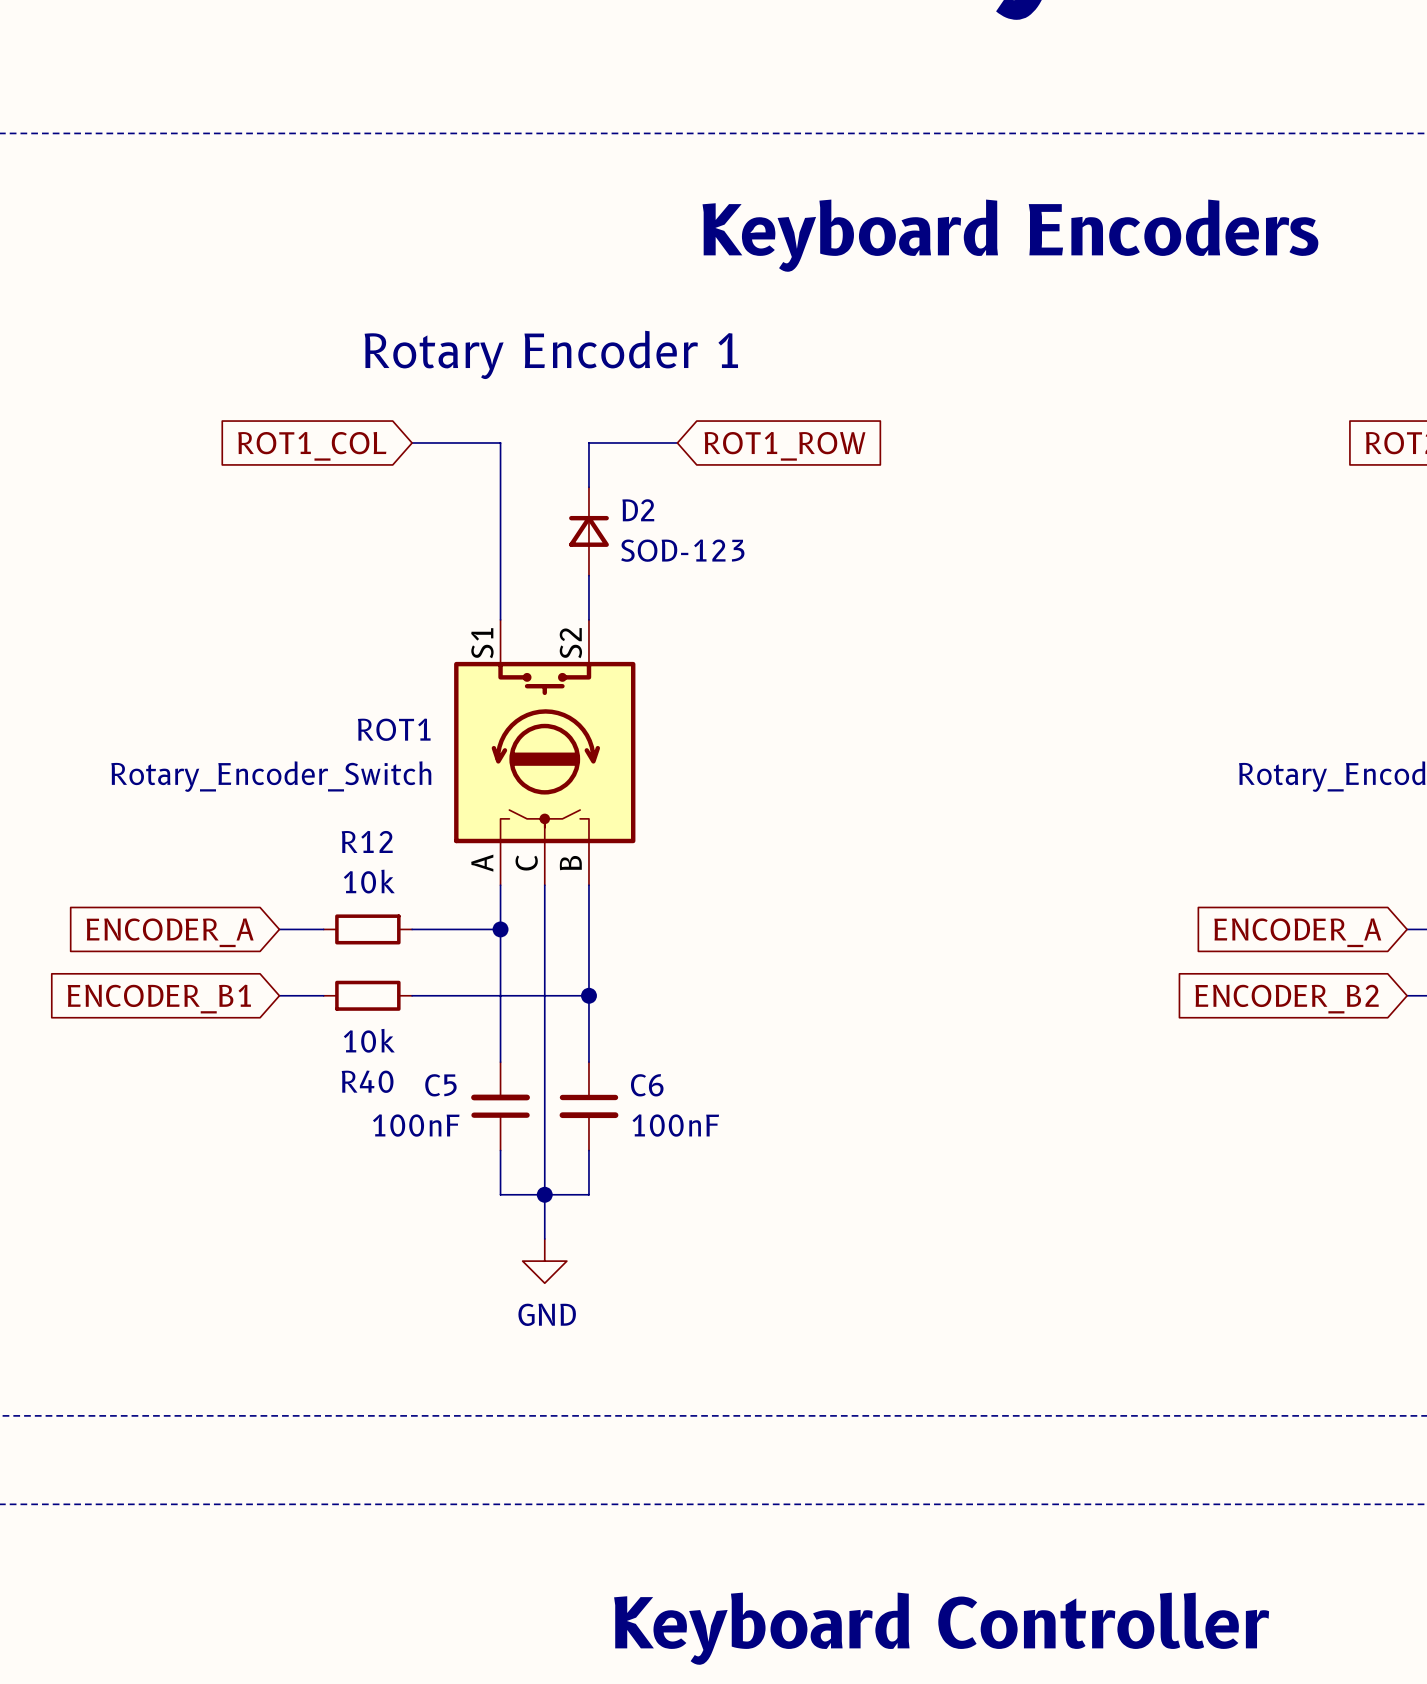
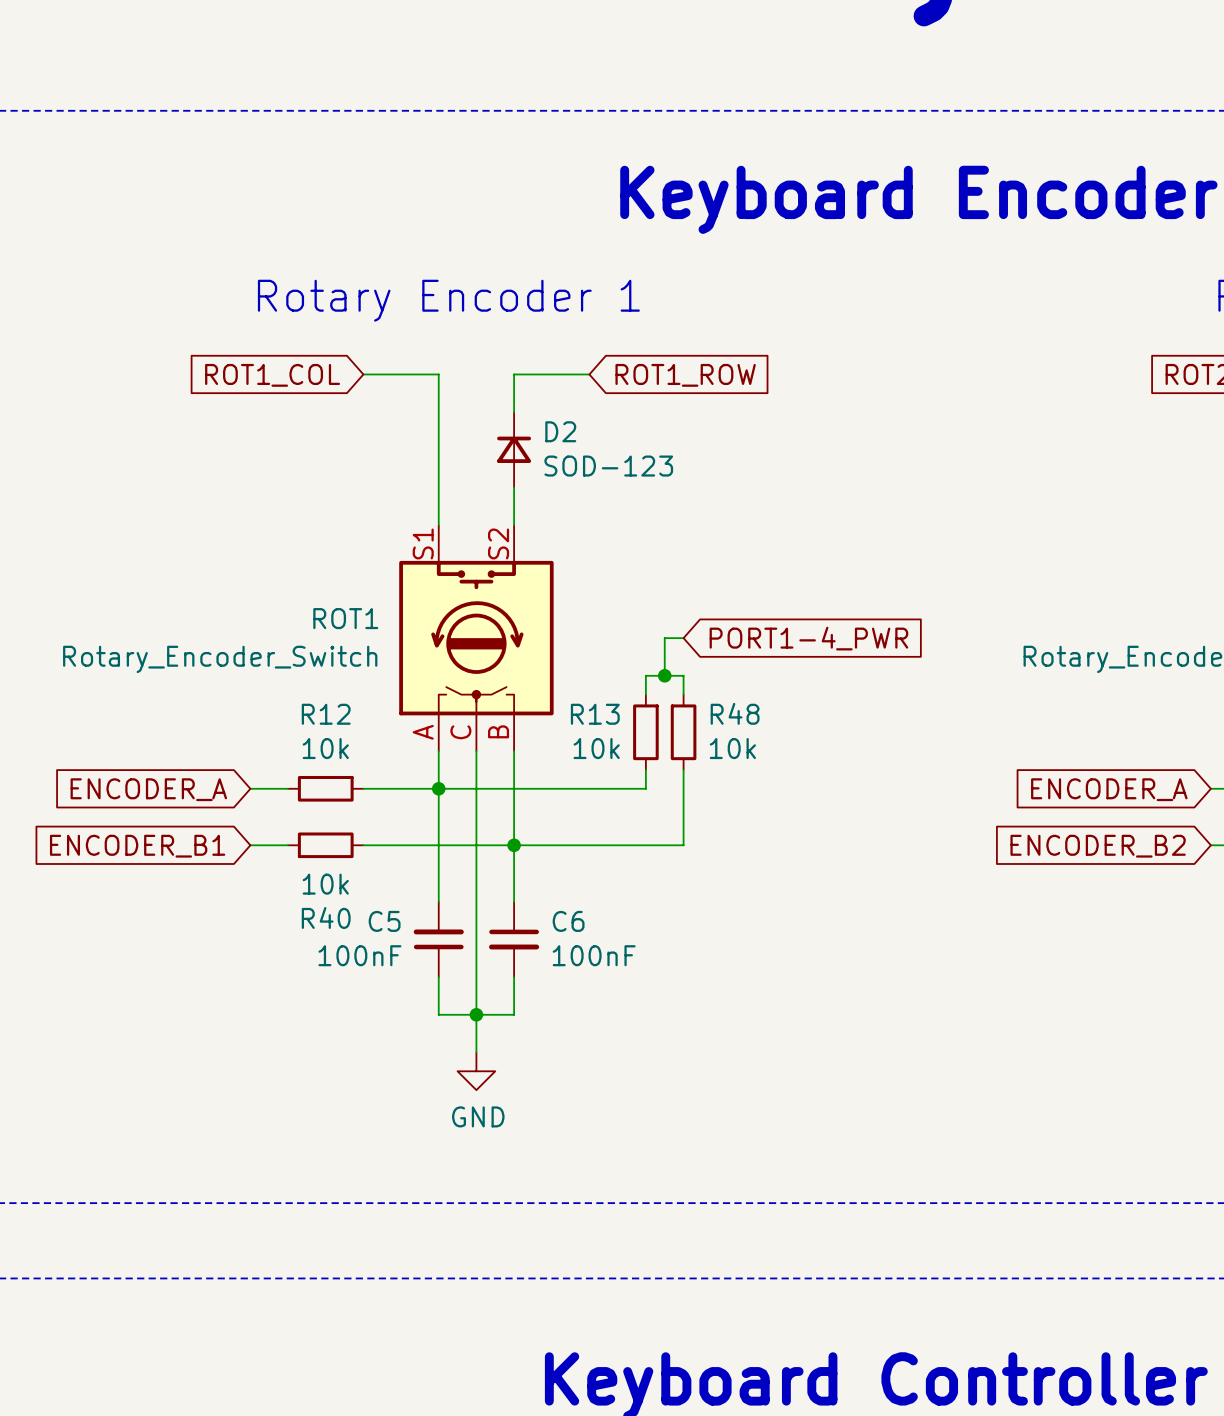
wire: none -> (683, 638) (664, 638) (664, 675)
global label: none -> PORT1-4_PWR (808, 638)
junction: none -> (664, 675)
wire: none -> (645, 694) (645, 675) (683, 675) (683, 694)
R13: none -> 10k (645, 732)
R48: none -> 10k (683, 732)
wire: none -> (645, 769) (645, 788) (438, 788)
wire: none -> (683, 769) (683, 845) (514, 845)

